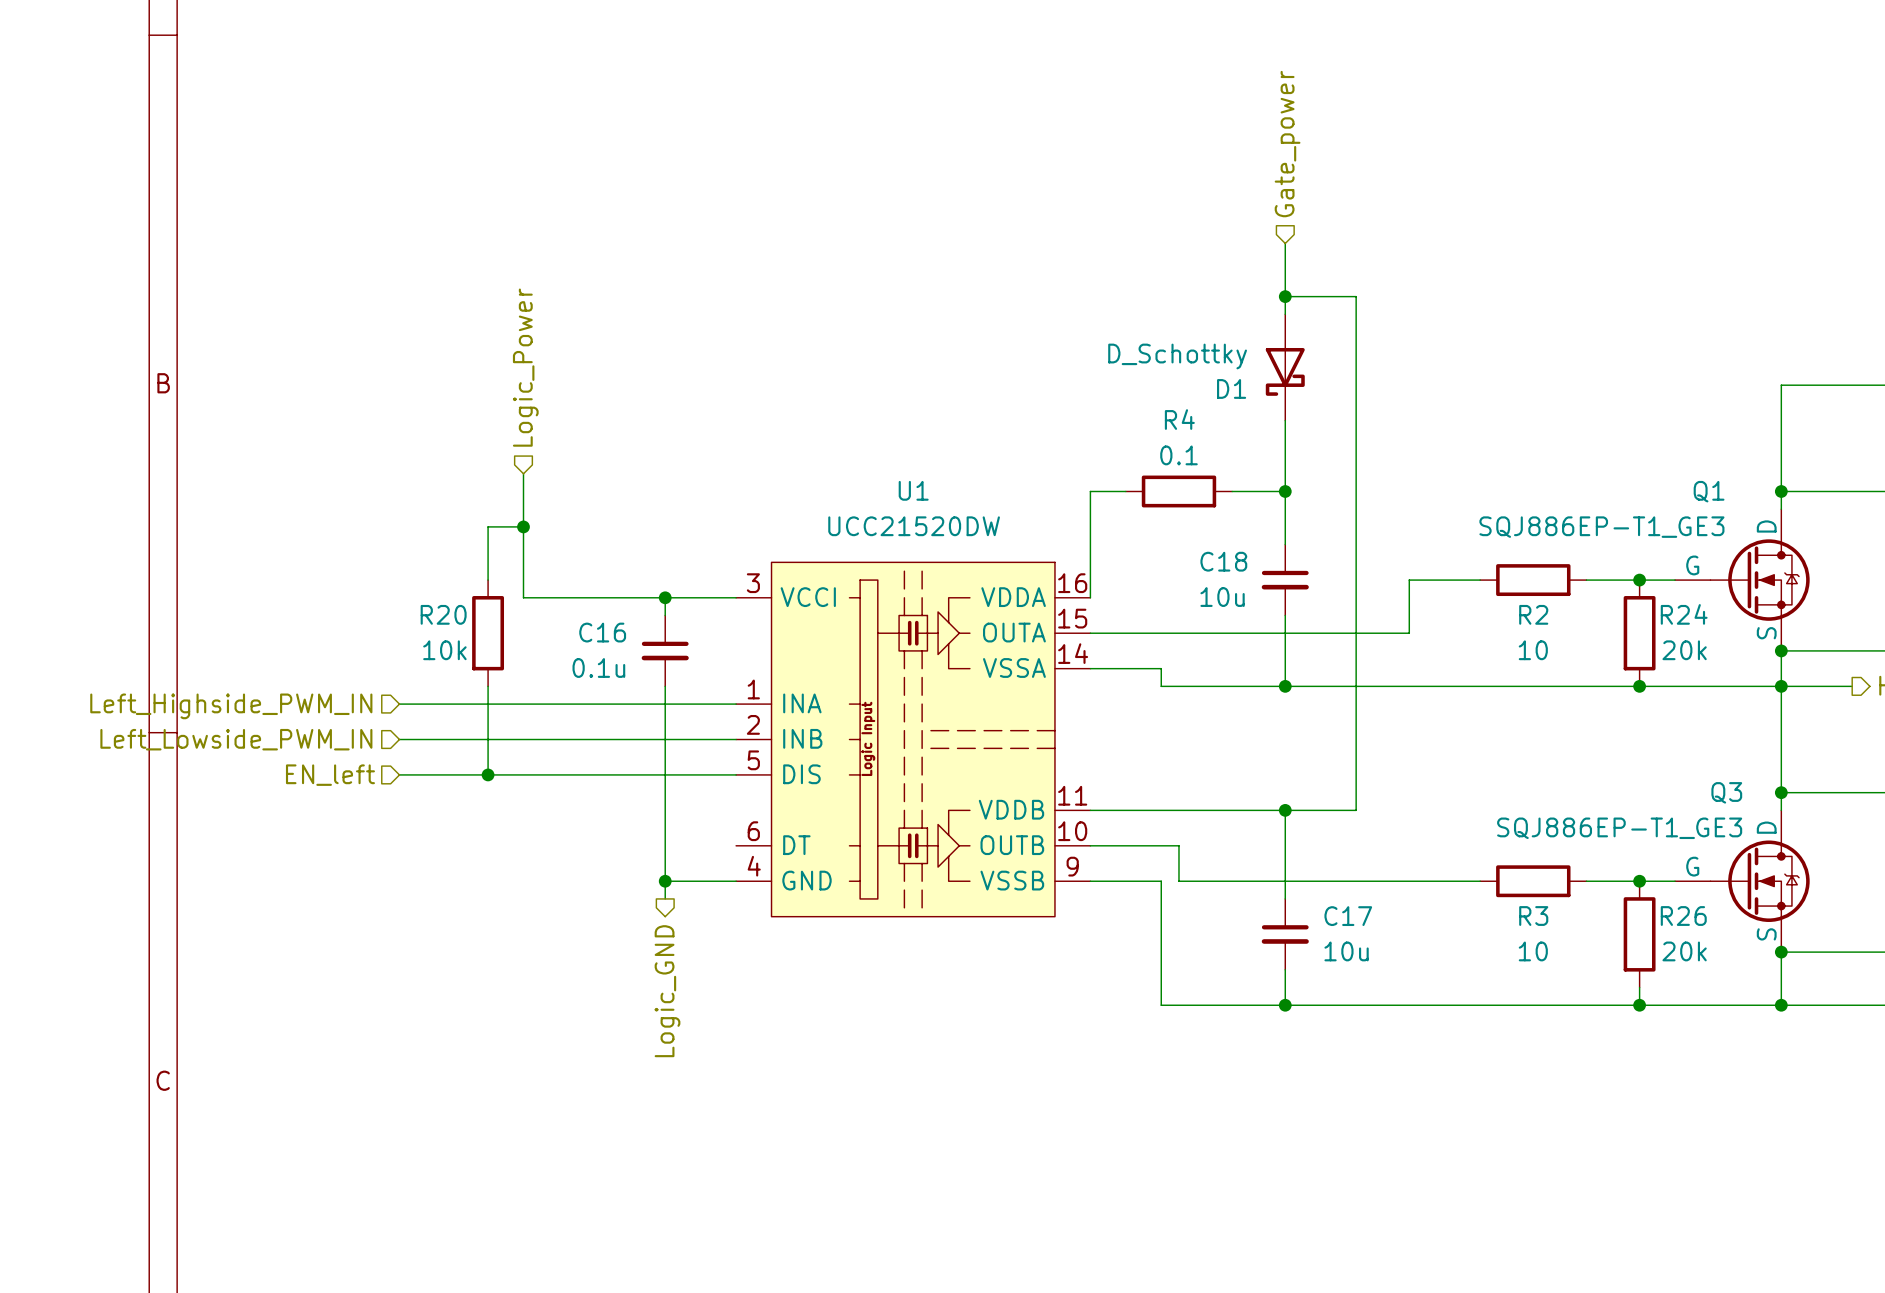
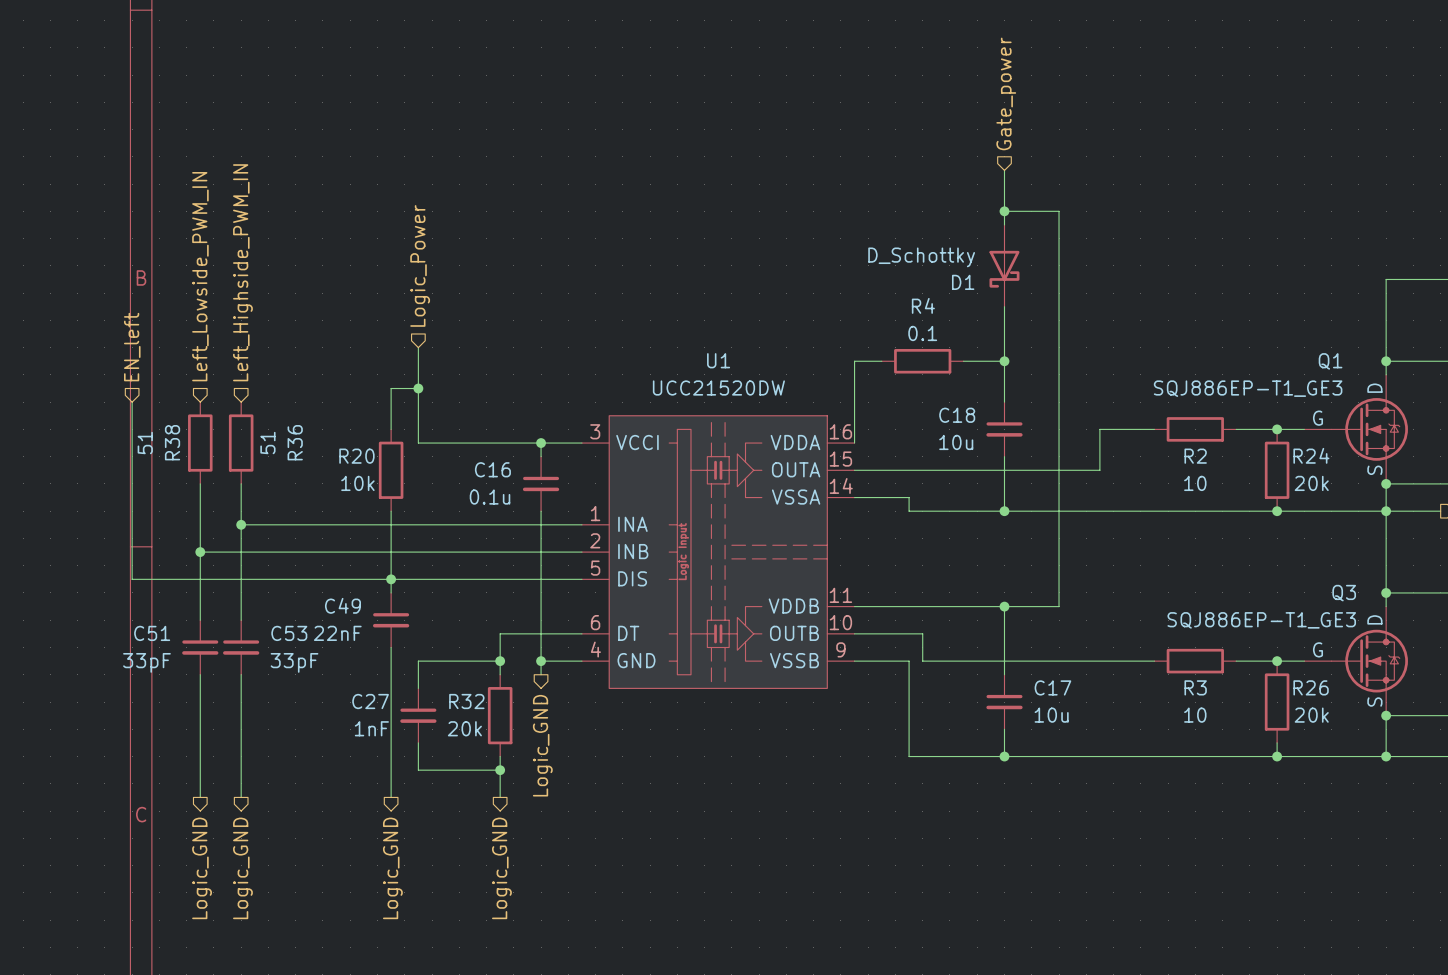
wire: none -> (132, 402) (132, 579) (322, 579)
R38: none -> 51 (200, 443)
R36: none -> 51 (241, 443)
wire: (665, 597) (665, 615) -> (541, 443) (541, 456)
junction position: (665, 597) -> (541, 443)
wire: none -> (200, 483) (200, 620)
wire: none -> (241, 483) (241, 620)
C16 position: (665, 650) -> (541, 483)
wire: (665, 686) (665, 898) -> (541, 511) (541, 674)
wire: none -> (241, 524) (322, 524)
junction: none -> (241, 524)
hierarchical label rotation: 0° (231, 706) -> 90° clockwise (242, 272)
hierarchical label position: Left_Highside_PWM_IN (231, 706) -> Left_Highside_PWM_IN (242, 272)
hierarchical label rotation: 0° (236, 739) -> 90° clockwise (200, 276)
hierarchical label position: Left_Lowside_PWM_IN (236, 739) -> Left_Lowside_PWM_IN (200, 276)
wire: none -> (200, 552) (322, 552)
junction: none -> (200, 552)
wire: none -> (391, 579) (391, 592)
hierarchical label rotation: 0° (330, 775) -> 90° clockwise (132, 347)
hierarchical label position: EN_left (330, 775) -> EN_left (132, 347)
C49: none -> 22nF (391, 620)
wire: none -> (581, 633) (500, 633) (500, 674)
C51: none -> 33pF (200, 647)
C53: none -> 33pF (241, 647)
wire: none -> (391, 647) (391, 797)
wire: none -> (500, 661) (418, 661) (418, 688)
junction: none -> (500, 661)
wire: (665, 881) (682, 881) -> none
junction: (665, 881) -> none
junction: none -> (541, 661)
wire: none -> (200, 674) (200, 797)
wire: none -> (241, 674) (241, 797)
C27: none -> 1nF (418, 715)
R32: none -> 20k (500, 715)
wire: none -> (418, 742) (418, 770) (500, 770)
hierarchical label position: Logic_GND (667, 991) -> Logic_GND (542, 745)
wire: none -> (500, 756) (500, 797)
junction: none -> (500, 770)
hierarchical label: none -> Logic_GND (202, 868)
hierarchical label: none -> Logic_GND (242, 868)
hierarchical label: none -> Logic_GND (392, 868)
hierarchical label: none -> Logic_GND (501, 868)

